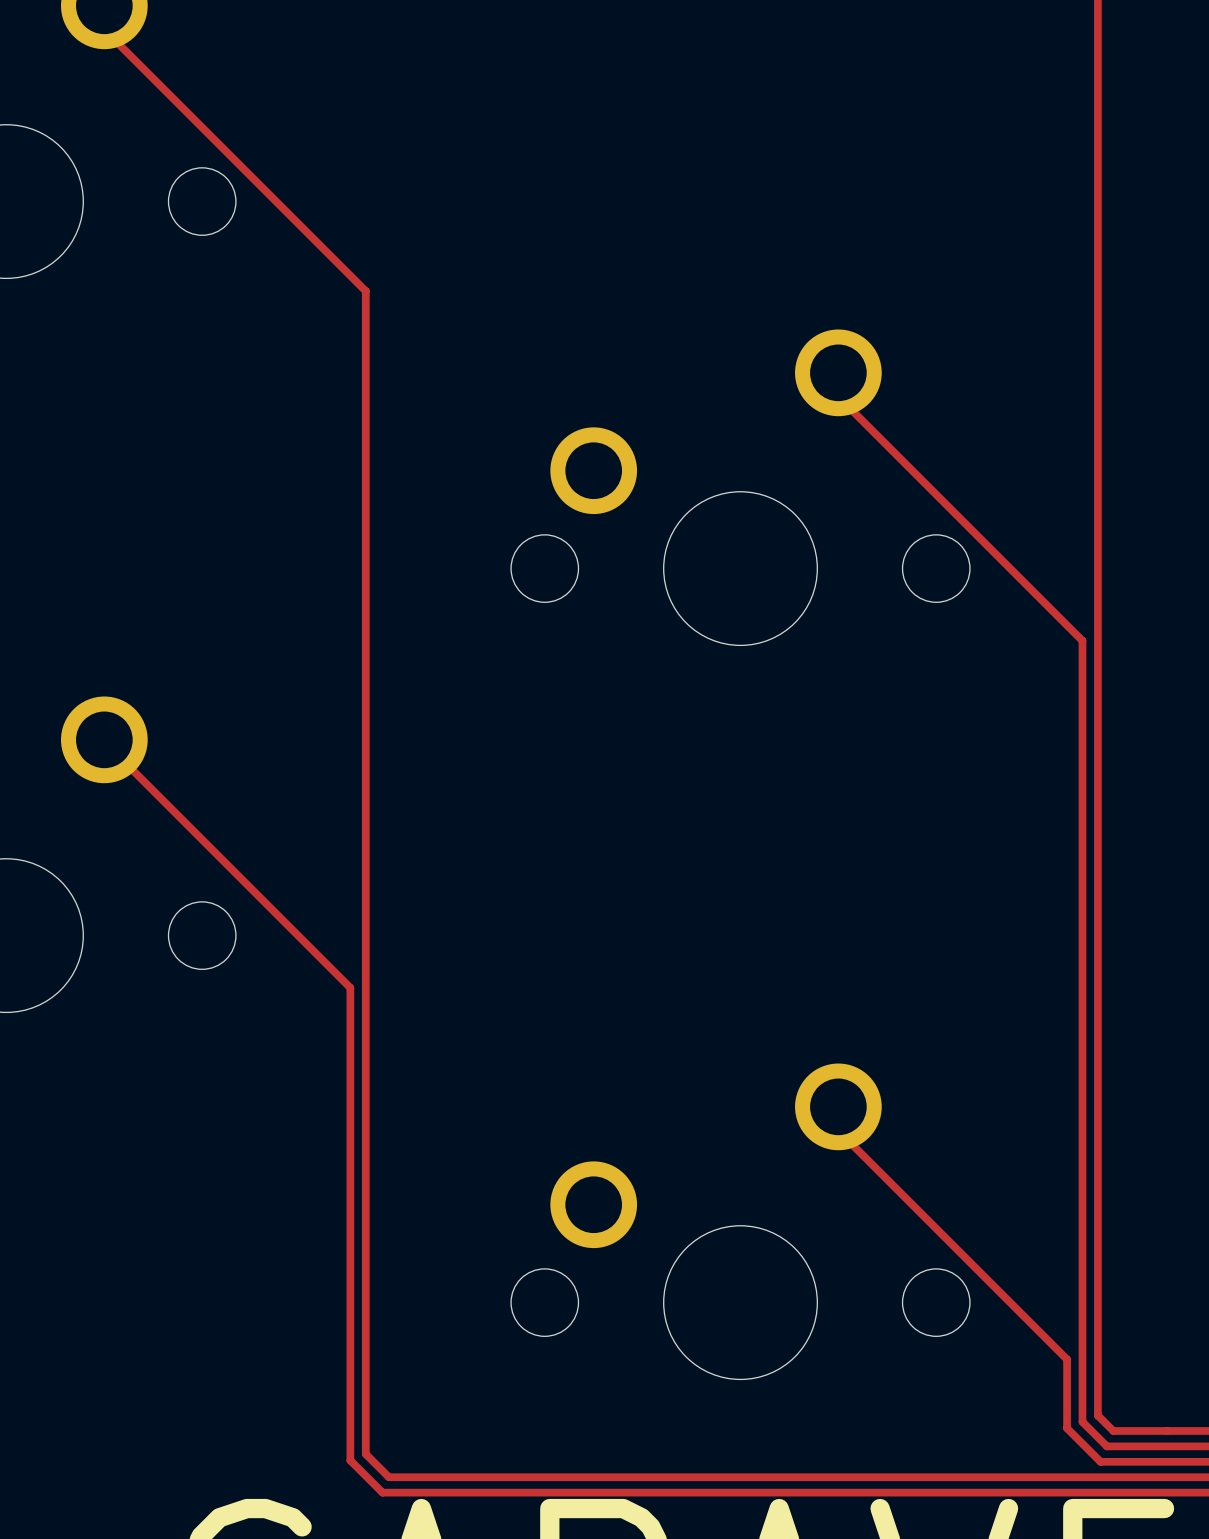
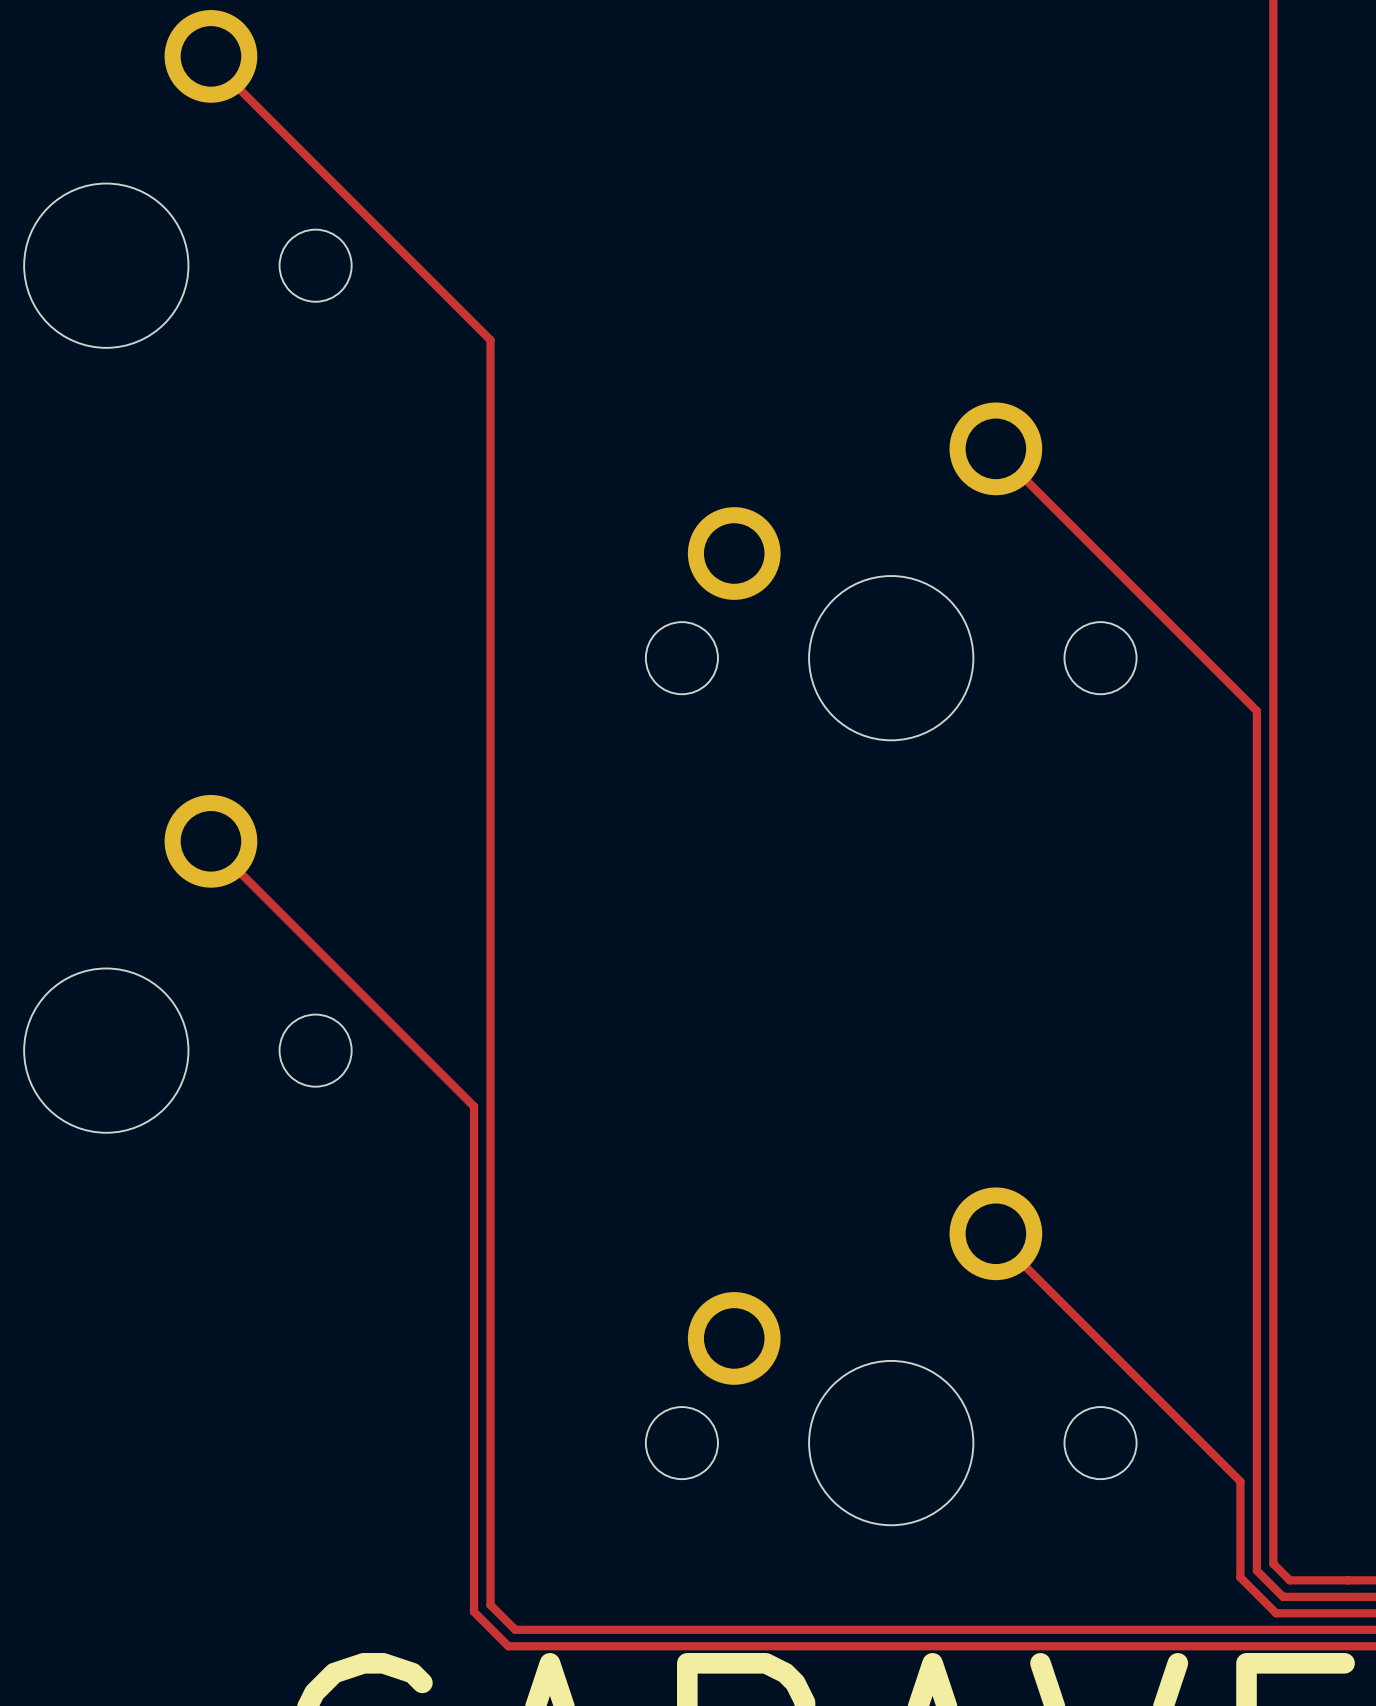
track: (102, 28) (365, 291) -> (209, 80) (230, 80) (490, 340) (490, 361)
track: (836, 395) (1082, 640) -> (994, 472) (1018, 472) (1256, 710) (1256, 735)
track: (836, 1129) (1067, 1359) -> (994, 1257) (1016, 1257) (1240, 1481) (1240, 1503)

